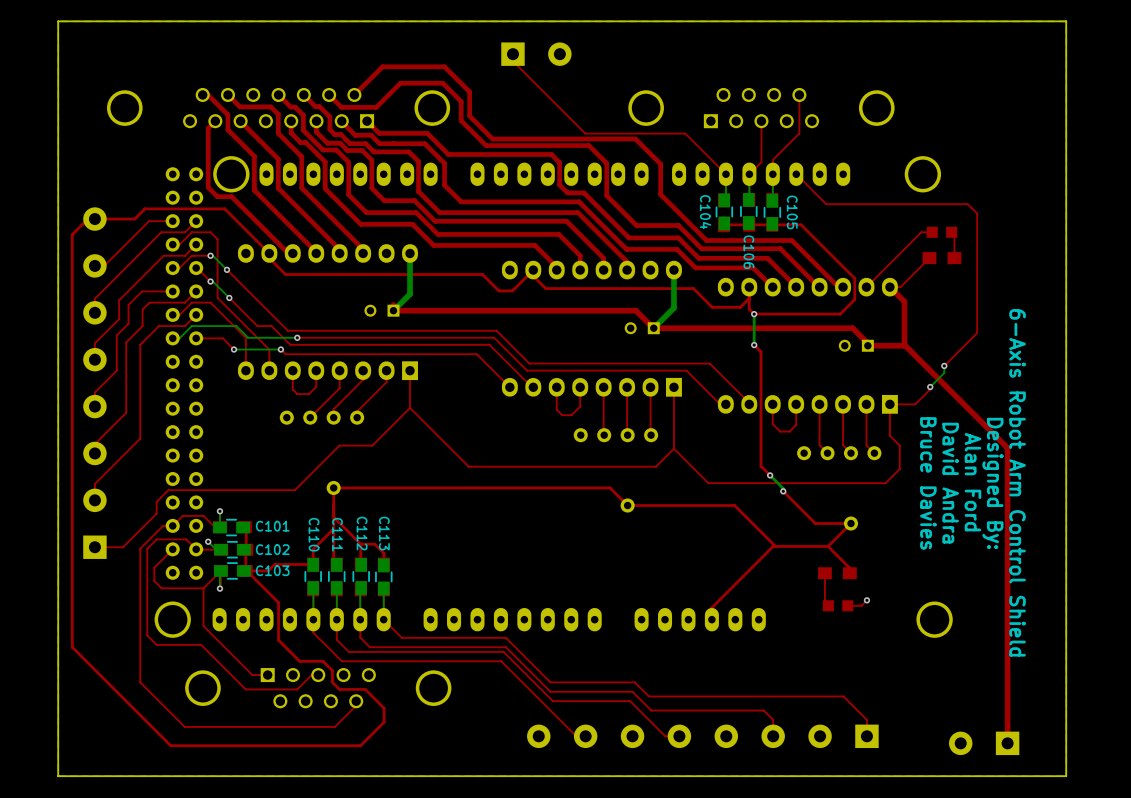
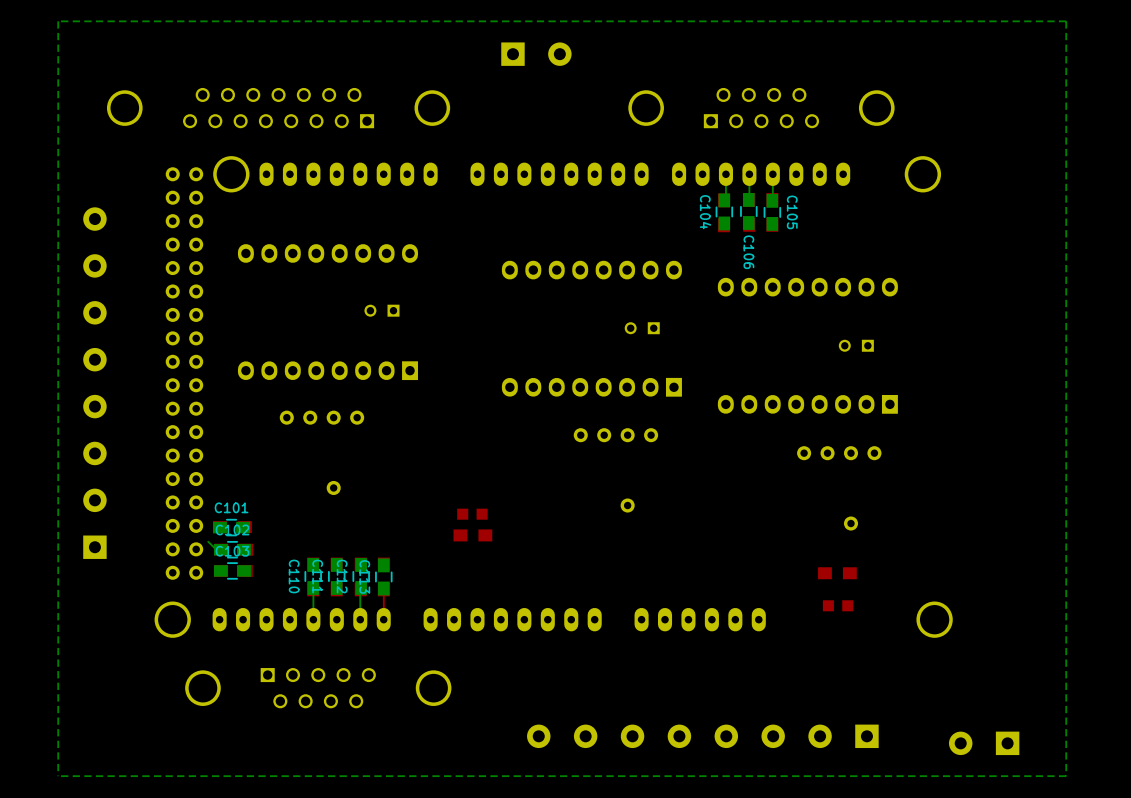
board edge: (1066, 21) (58, 21) (58, 776) (1066, 776) (1066, 21) -> none
top track: (512, 54) (512, 61) (585, 133) (685, 133) (725, 174) (725, 198) (723, 200) -> none
top track: (202, 94) (208, 94) (227, 114) (227, 129) (254, 156) (254, 190) (316, 253) -> none
top track: (227, 94) (239, 106) (270, 106) (278, 114) (278, 133) (301, 156) (301, 188) (363, 249) (363, 253) -> none
top track: (278, 94) (290, 107) (295, 107) (303, 115) (303, 130) (323, 150) (336, 150) (348, 162) (348, 194) (366, 212) (416, 212) (437, 234) (558, 234) (580, 255) (580, 270) -> none
top track: (303, 94) (329, 116) (329, 129) (334, 134) (340, 134) (350, 143) (365, 143) (373, 151) (408, 151) (418, 161) (418, 191) (439, 212) (577, 212) (627, 261) (627, 270) -> none
top track: (329, 94) (341, 107) (376, 107) (400, 83) (442, 83) (461, 101) (461, 120) (486, 145) (588, 145) (606, 163) (606, 195) (636, 225) (678, 225) (701, 248) (780, 248) (819, 287) -> none
top track: (354, 94) (382, 66) (444, 66) (469, 91) (469, 116) (492, 139) (635, 139) (660, 164) (660, 194) (706, 240) (791, 240) (838, 287) (843, 287) -> none
top track: (799, 94) (799, 133) (772, 159) (772, 199) -> none
top track: (215, 121) (208, 128) (208, 187) (217, 196) (231, 196) (288, 253) (292, 253) -> none
top track: (240, 121) (278, 159) (278, 188) (339, 249) (339, 253) -> none
top track: (291, 121) (291, 133) (300, 142) (305, 142) (325, 161) (325, 188) (360, 224) (412, 224) (433, 245) (535, 245) (556, 267) (556, 270) -> none
top track: (316, 121) (316, 132) (327, 143) (340, 143) (347, 150) (362, 150) (371, 160) (371, 188) (384, 200) (414, 200) (435, 221) (566, 221) (603, 258) (603, 270) -> none
top track: (341, 121) (355, 135) (371, 135) (379, 143) (424, 143) (444, 163) (444, 185) (461, 201) (579, 201) (626, 249) (677, 249) (695, 267) (753, 267) (772, 287) -> none
top track: (367, 121) (379, 133) (427, 133) (448, 154) (551, 154) (559, 162) (559, 184) (567, 192) (584, 192) (629, 237) (678, 237) (698, 258) (767, 258) (796, 287) -> none
top track: (761, 121) (761, 162) (749, 174) (749, 199) -> none
top track: (796, 174) (826, 204) (967, 204) (977, 213) (977, 333) (944, 365) -> none
top track: (172, 221) (149, 221) (104, 265) (94, 265) -> none
top track: (196, 221) (185, 232) (161, 232) (94, 298) (94, 312) -> none
top track: (723, 225) (801, 224) (854, 278) (854, 299) (840, 314) (754, 314) (749, 309) (749, 287) -> none
top track: (932, 232) (921, 232) (866, 287) -> none
part: (941, 232) -> none
top track: (954, 235) (954, 258) -> none
top track: (172, 244) (179, 244) (191, 232) (210, 232) (217, 239) (217, 297) (269, 349) (269, 370) -> none
top track: (196, 244) (185, 255) (163, 255) (119, 300) (119, 319) (94, 343) (94, 359) -> none
bottom track: (410, 253) (410, 294) (393, 310) -> none
bottom track: (210, 255) (212, 255) (226, 269) -> none
top track: (210, 255) (191, 255) (179, 268) (172, 268) -> none
via: (210, 255) -> none
top track: (929, 258) (900, 287) (889, 287) (904, 301) (904, 345) -> none
part: (941, 258) -> none
top track: (196, 268) (210, 281) -> none
top track: (226, 269) (287, 330) (496, 330) (529, 363) (709, 363) (749, 404) -> none
via: (226, 269) -> none
bottom track: (673, 270) (673, 308) (653, 328) -> none
bottom track: (210, 281) (212, 281) (229, 297) -> none
via: (210, 281) -> none
top track: (172, 291) (142, 291) (128, 304) (128, 323) (116, 335) (116, 370) (94, 392) (94, 406) -> none
top track: (196, 291) (185, 302) (149, 302) (142, 309) (142, 326) (126, 342) (126, 412) (94, 444) (94, 453) -> none
top track: (229, 297) (257, 326) (271, 326) (290, 344) (489, 344) (533, 387) -> none
via: (229, 297) -> none
top track: (749, 298) (740, 307) (712, 307) (693, 288) (545, 288) (533, 276) (533, 270) (512, 290) (498, 290) (482, 274) (285, 274) (269, 258) (269, 253) (224, 208) (144, 208) (134, 219) (87, 219) (72, 234) (72, 647) (170, 745) (360, 745) (384, 722) (384, 708) (365, 689) (339, 689) (332, 682) (332, 670) (323, 661) (299, 661) (278, 640) (278, 602) (246, 570) -> none
top track: (393, 304) (393, 310) (635, 310) (653, 328) (852, 328) (867, 343) (867, 345) (905, 345) (1007, 447) (1007, 743) -> none
top track: (172, 314) (179, 314) (191, 302) (210, 302) (245, 337) (245, 370) -> none
top track: (196, 314) (185, 326) (159, 326) (140, 344) (140, 438) (94, 483) (94, 500) -> none
bottom track: (754, 314) (754, 345) -> none
via: (754, 314) -> none
bottom track: (297, 337) (248, 337) (236, 326) (191, 326) (179, 338) (172, 338) -> none
top track: (297, 337) (494, 337) (527, 370) (686, 370) (720, 404) (725, 404) -> none
via: (297, 337) -> none
top track: (196, 338) (222, 338) (234, 349) -> none
top track: (754, 345) (760, 351) (760, 466) (770, 475) -> none
via: (754, 345) -> none
via: (234, 349) -> none
bottom track: (280, 349) (234, 349) -> none
top track: (280, 349) (285, 354) (476, 354) (509, 387) -> none
via: (280, 349) -> none
bottom track: (944, 365) (944, 372) (930, 387) -> none
via: (944, 365) -> none
top track: (316, 370) (316, 386) (309, 394) (297, 394) (292, 389) (292, 370) -> none
top track: (339, 370) (339, 388) (310, 417) -> none
top track: (363, 370) (363, 379) (333, 409) (333, 417) -> none
top track: (386, 370) (386, 382) (357, 411) (357, 417) -> none
top track: (410, 370) (410, 407) -> none
top track: (580, 387) (580, 406) (571, 415) (562, 415) (556, 409) (556, 387) -> none
top track: (603, 387) (604, 435) -> none
top track: (627, 387) (627, 435) -> none
top track: (650, 387) (651, 435) -> none
top track: (673, 387) (673, 448) -> none
top track: (930, 387) (930, 389) (915, 404) (889, 404) (889, 435) (899, 445) (899, 469) (885, 483) (708, 483) (673, 448) -> none
via: (930, 387) -> none
top track: (796, 404) (796, 425) (789, 431) (780, 431) (772, 424) (772, 404) -> none
top track: (819, 404) (819, 445) (827, 453) -> none
top track: (843, 404) (843, 445) (850, 453) -> none
top track: (866, 404) (866, 445) (874, 453) -> none
top track: (410, 407) (468, 466) (655, 466) (673, 448) -> none
top track: (410, 407) (372, 445) (339, 445) (294, 490) (168, 490) (156, 501) (156, 513) (123, 547) (94, 547) -> none
bottom track: (770, 475) (783, 488) (783, 491) -> none
via: (770, 475) -> none
text: Alan Ford (972, 482) -> none
text: 6-Axis Robot Arm Control Shield (1017, 482) -> none
text: Bruce Davies (928, 483) -> none
text: David Andra (950, 483) -> none
text: Designed By: (992, 483) -> none
top track: (783, 491) (815, 523) (850, 523) (828, 546) -> none
via: (783, 491) -> none
bottom track: (219, 511) (219, 527) -> none
top track: (219, 511) (219, 527) (214, 527) (203, 515) (182, 515) (172, 525) (163, 525) (140, 548) (140, 682) (184, 726) (334, 726) (356, 705) (356, 701) (351, 701) -> none
via: (219, 511) -> none
part: none -> (472, 514)
top track: (333, 517) (360, 544) -> none
C101 name position: C101 (272, 526) -> C101 (231, 507)
top track: (246, 528) (245, 570) (268, 570) (274, 564) (313, 564) (313, 549) (333, 528) -> none
C112 name position: C112 (362, 533) -> C112 (342, 576)
C113 name position: C113 (384, 533) -> C113 (364, 576)
C110 name position: C110 (314, 534) -> C110 (294, 576)
C111 name position: C111 (337, 534) -> C111 (317, 576)
part: none -> (472, 535)
via: (208, 541) -> none
top track: (360, 544) (374, 544) (384, 553) (383, 564) -> none
top track: (360, 544) (360, 564) -> none
top track: (775, 546) (734, 505) (627, 505) (610, 487) (333, 487) (333, 561) (336, 564) -> none
top track: (828, 546) (849, 568) (849, 573) -> none
top track: (828, 546) (773, 546) (711, 607) (711, 619) -> none
top track: (173, 549) (154, 567) (154, 580) (161, 588) (203, 588) -> none
top track: (221, 549) (196, 549) (186, 539) (156, 539) (147, 548) (147, 635) (156, 644) (201, 644) (245, 689) (297, 689) (311, 675) (318, 675) -> none
C102 name position: C102 (272, 549) -> C102 (232, 529)
bottom track: (220, 570) (219, 588) -> none
C103 name position: C103 (272, 570) -> C103 (232, 551)
top track: (824, 573) (824, 602) (828, 605) -> none
top track: (203, 588) (220, 570) (219, 588) -> none
top track: (203, 588) (203, 626) (252, 675) (267, 675) -> none
via: (219, 588) -> none
bottom track: (336, 588) (336, 619) -> none
bottom track: (383, 588) (383, 619) -> none
top track: (313, 589) (313, 632) (341, 661) (501, 661) (576, 736) (585, 736) -> none
top track: (336, 589) (336, 639) (348, 651) (503, 651) (552, 701) (630, 701) (665, 736) (679, 736) -> none
top track: (360, 589) (360, 637) (369, 647) (505, 647) (550, 691) (632, 691) (651, 710) (763, 710) (773, 719) (773, 736) -> none
top track: (866, 600) (861, 605) (847, 605) -> none
via: (866, 600) -> none
top track: (383, 619) (401, 637) (505, 637) (550, 682) (634, 682) (648, 696) (843, 696) (866, 719) (866, 736) -> none

